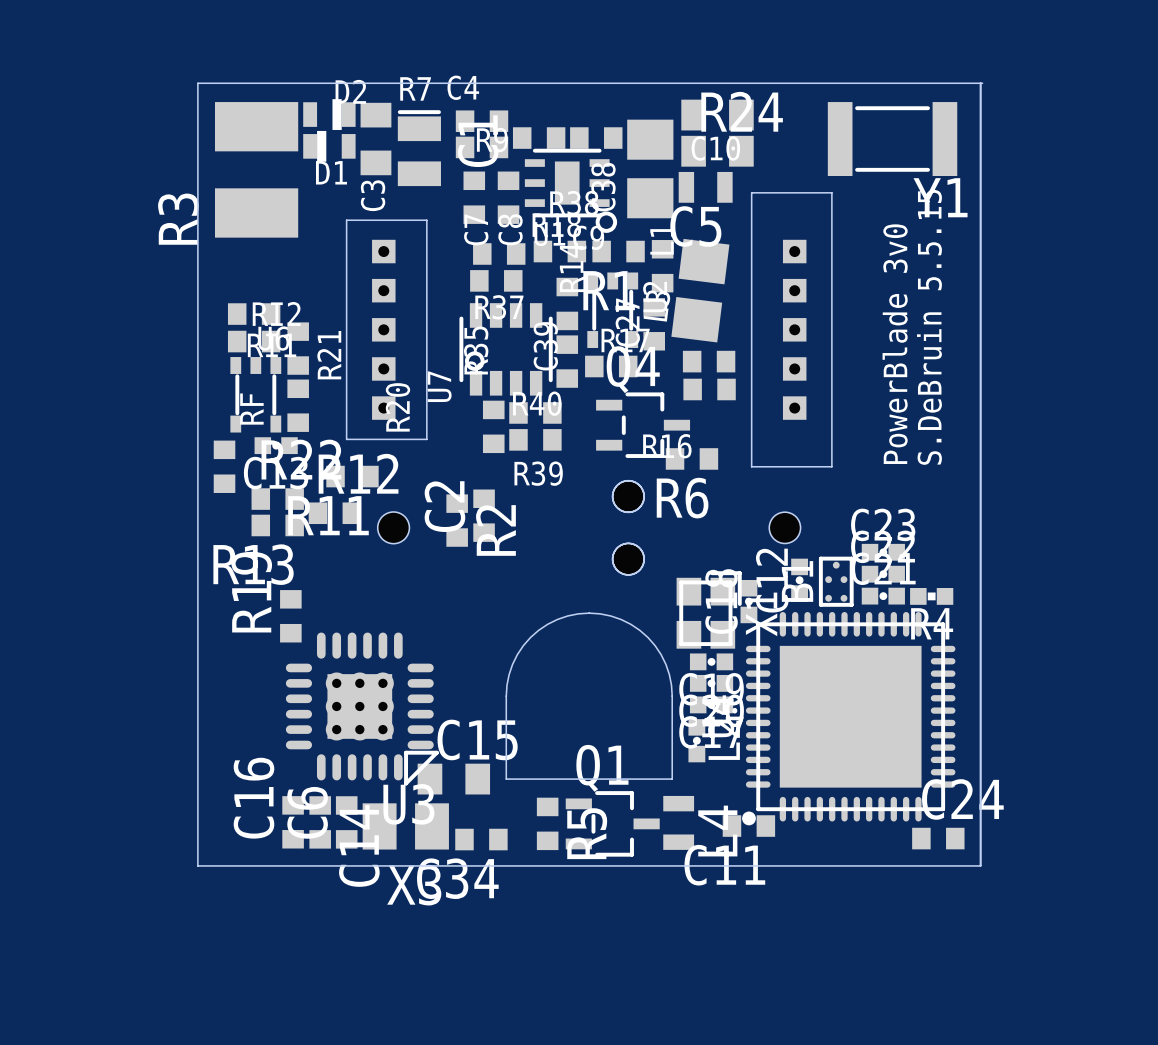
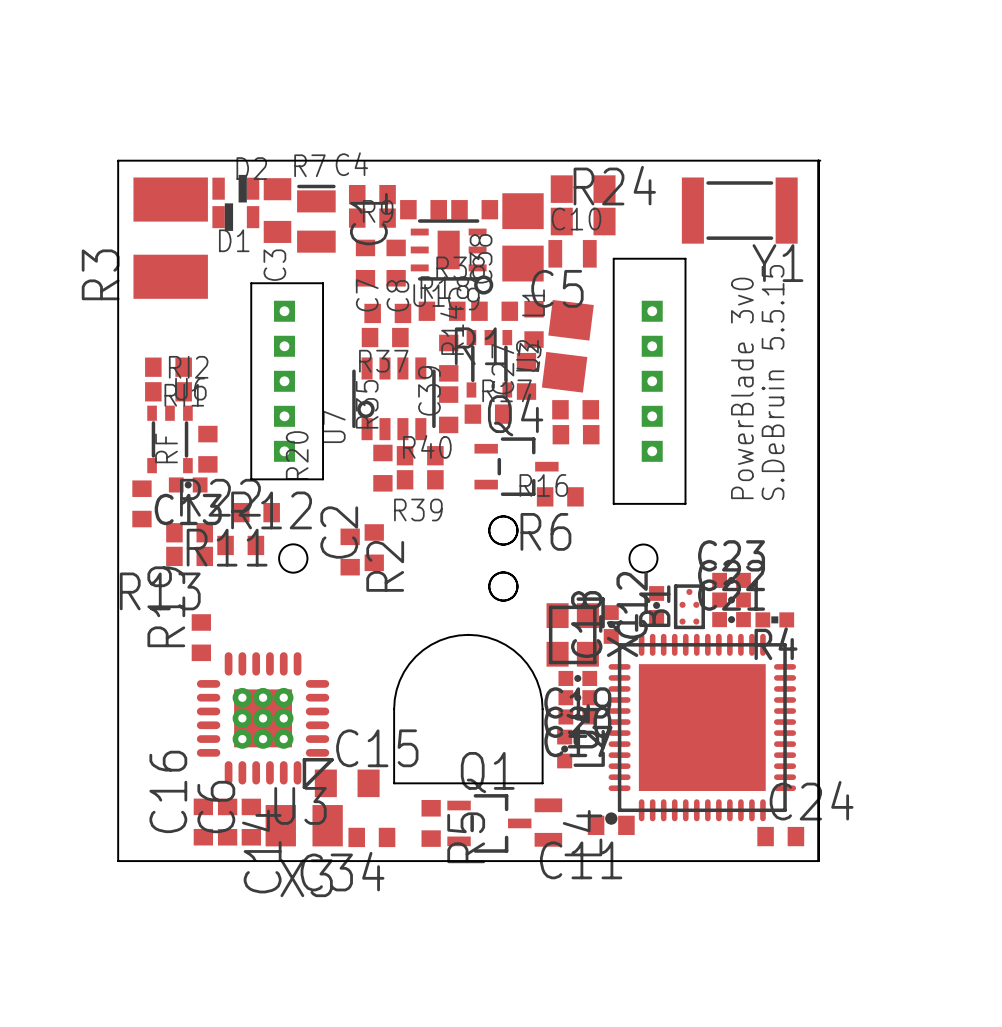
R21: (298, 348) -> none

